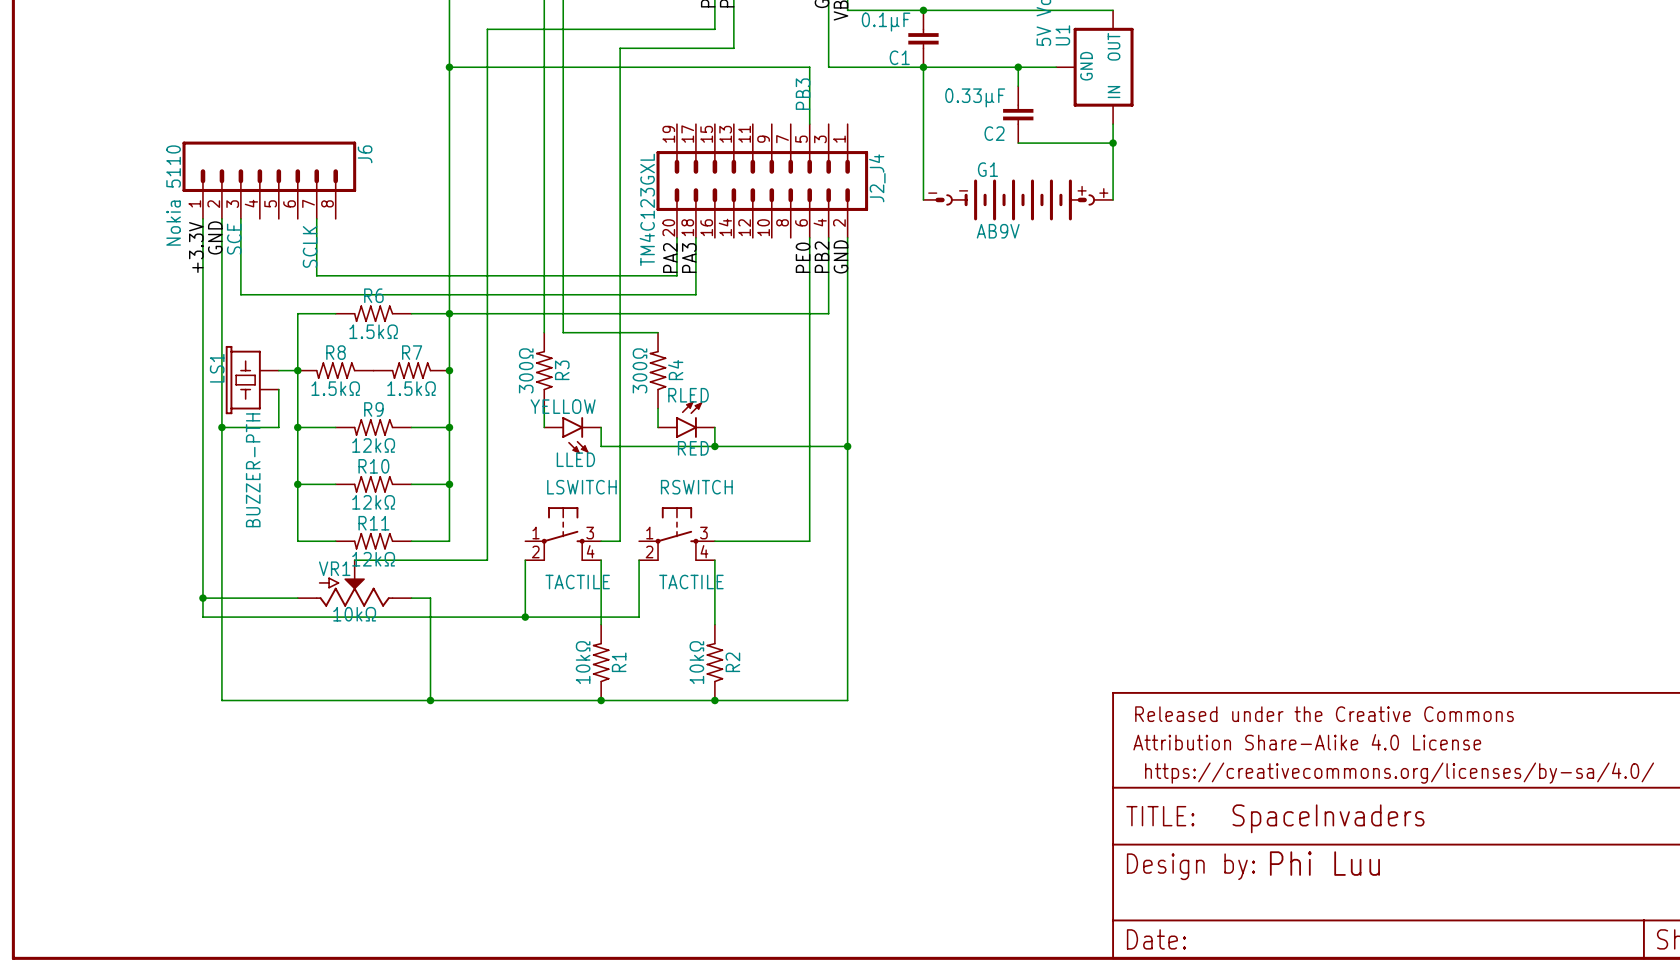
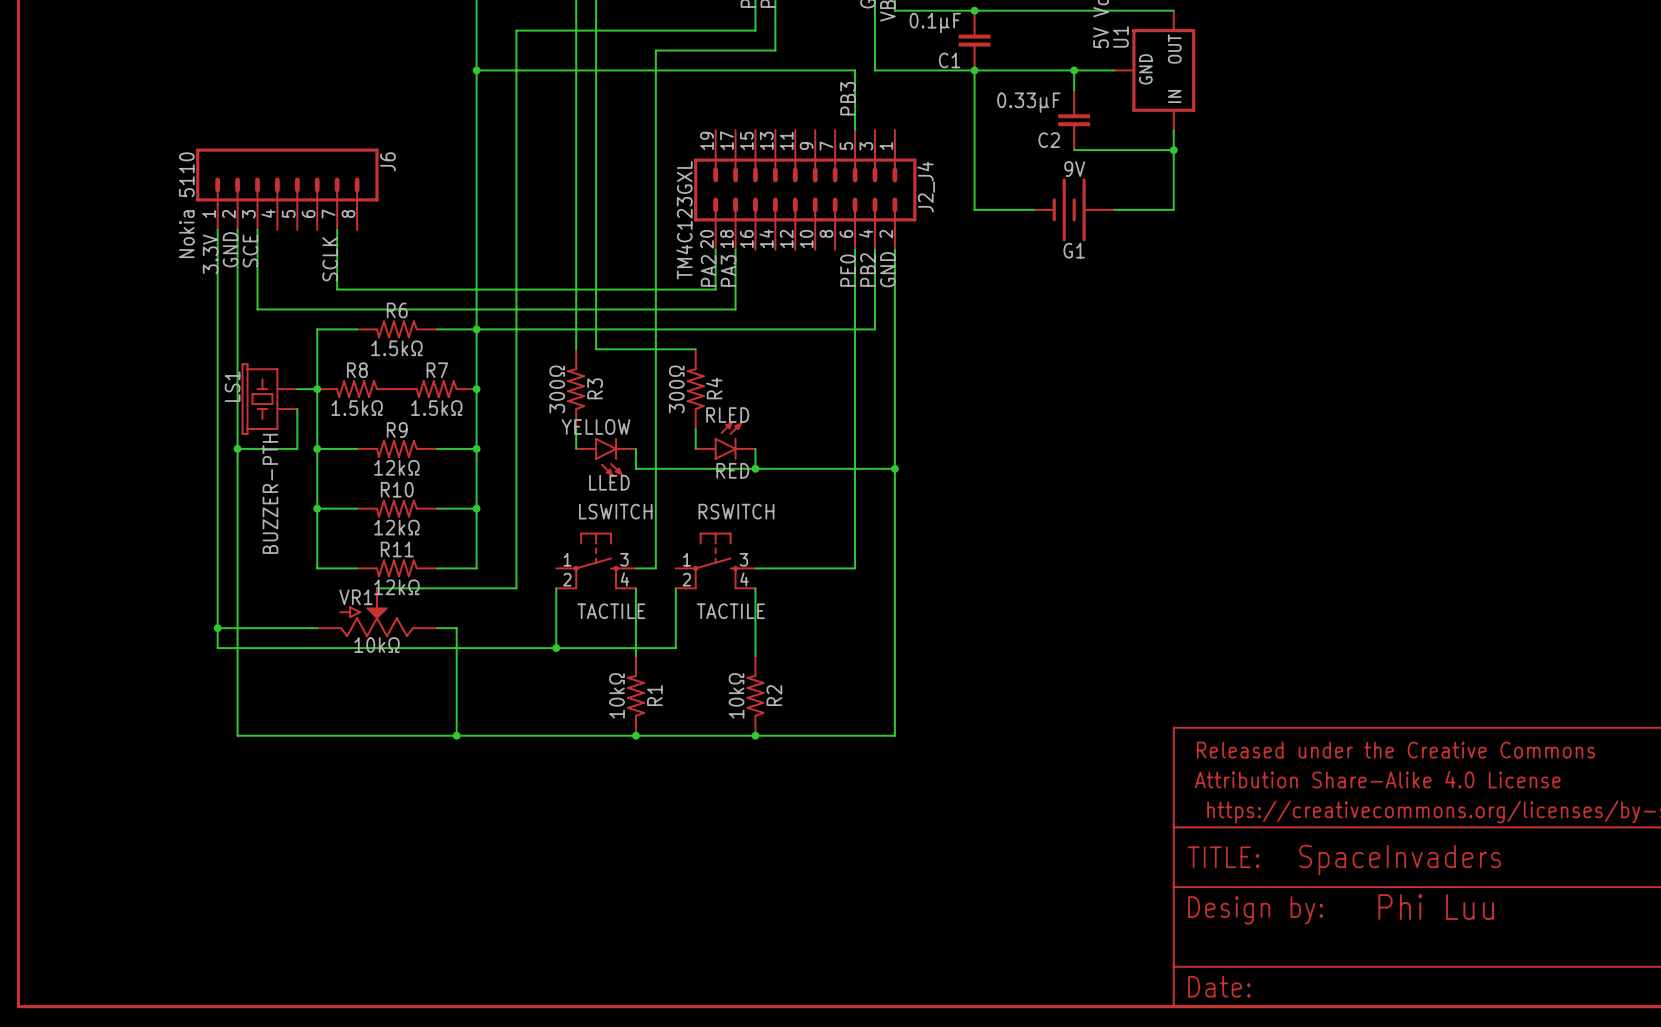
G1 name position: G1 (987, 169) -> G1 (1074, 250)
G1 symbol: [923, 179, 1114, 221] -> [1034, 178, 1115, 242]
G1 value: AB9V (998, 231) -> 9V (1074, 169)
label: +3.3V (196, 247) -> 3.3V (210, 254)
text position: Phi Luu (1324, 863) -> Phi Luu (1436, 907)

